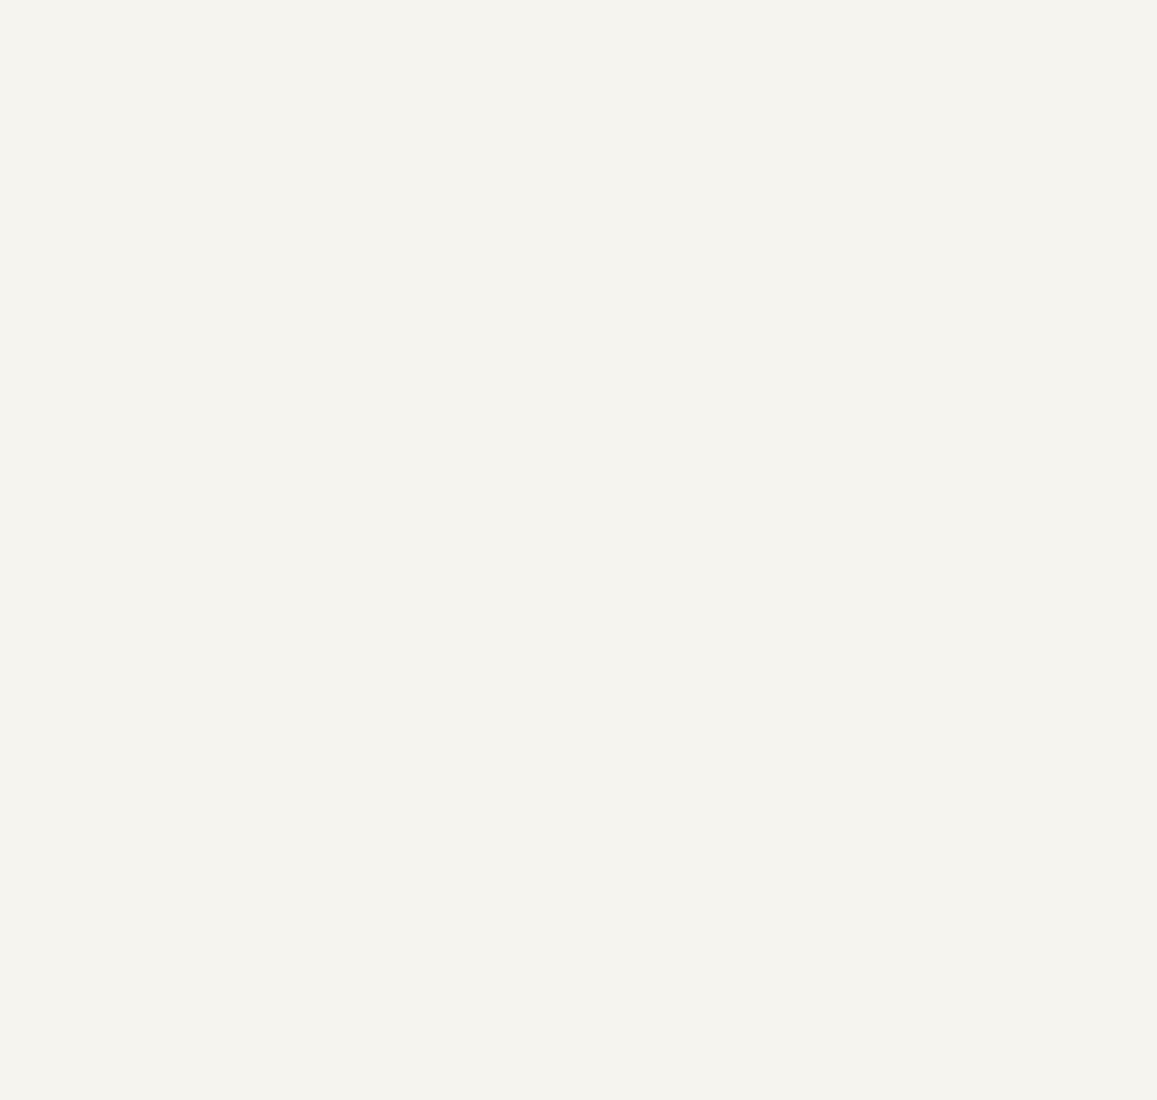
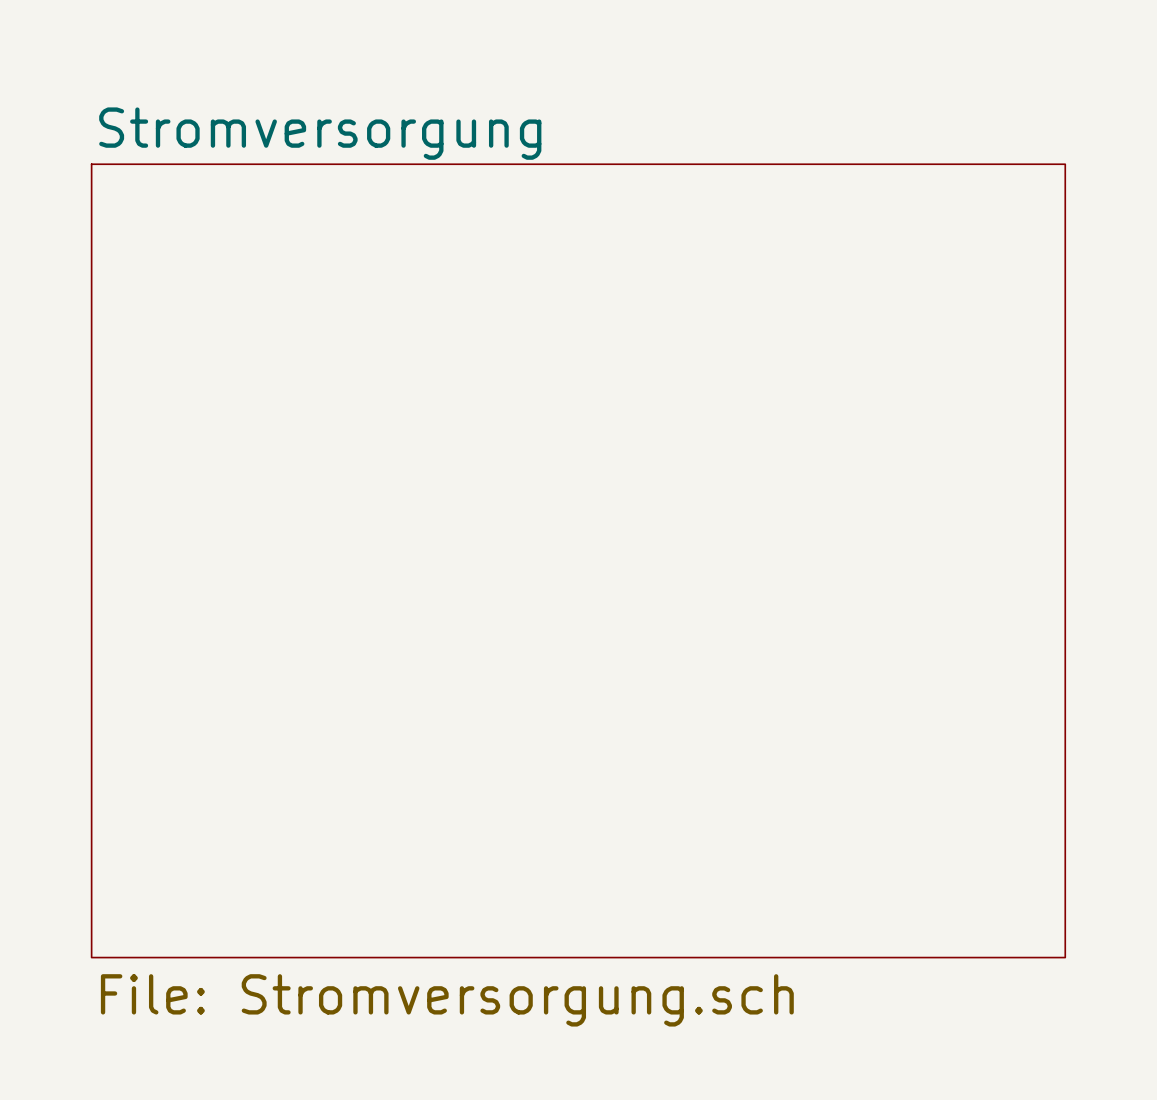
sheet Stromversorgung: none -> File: Stromversorgung.sch (578, 560)

